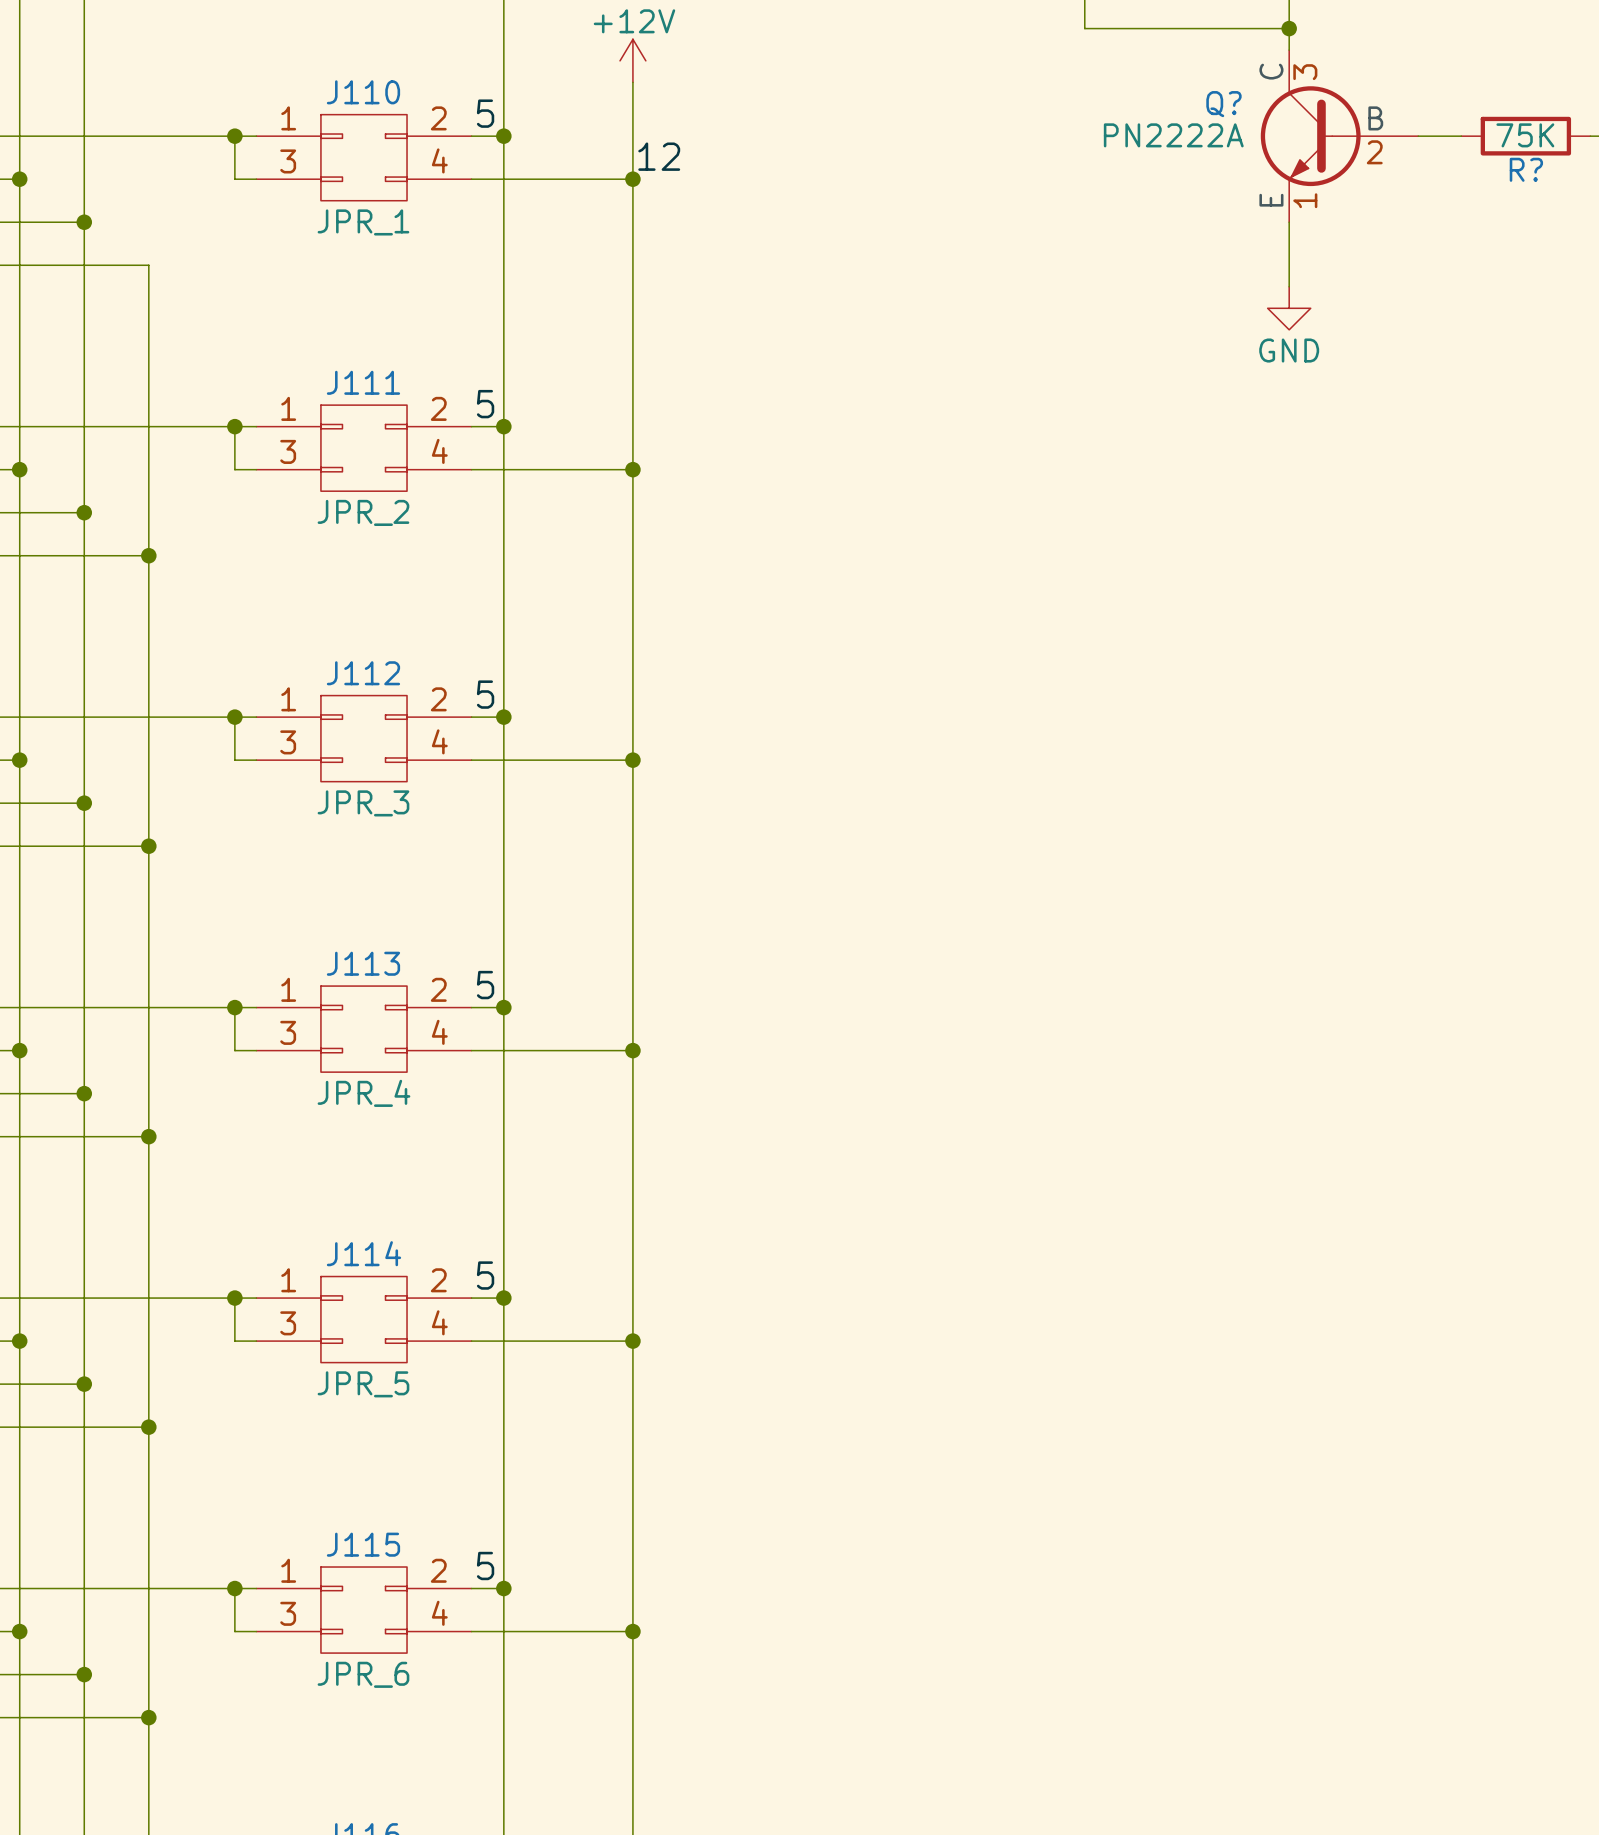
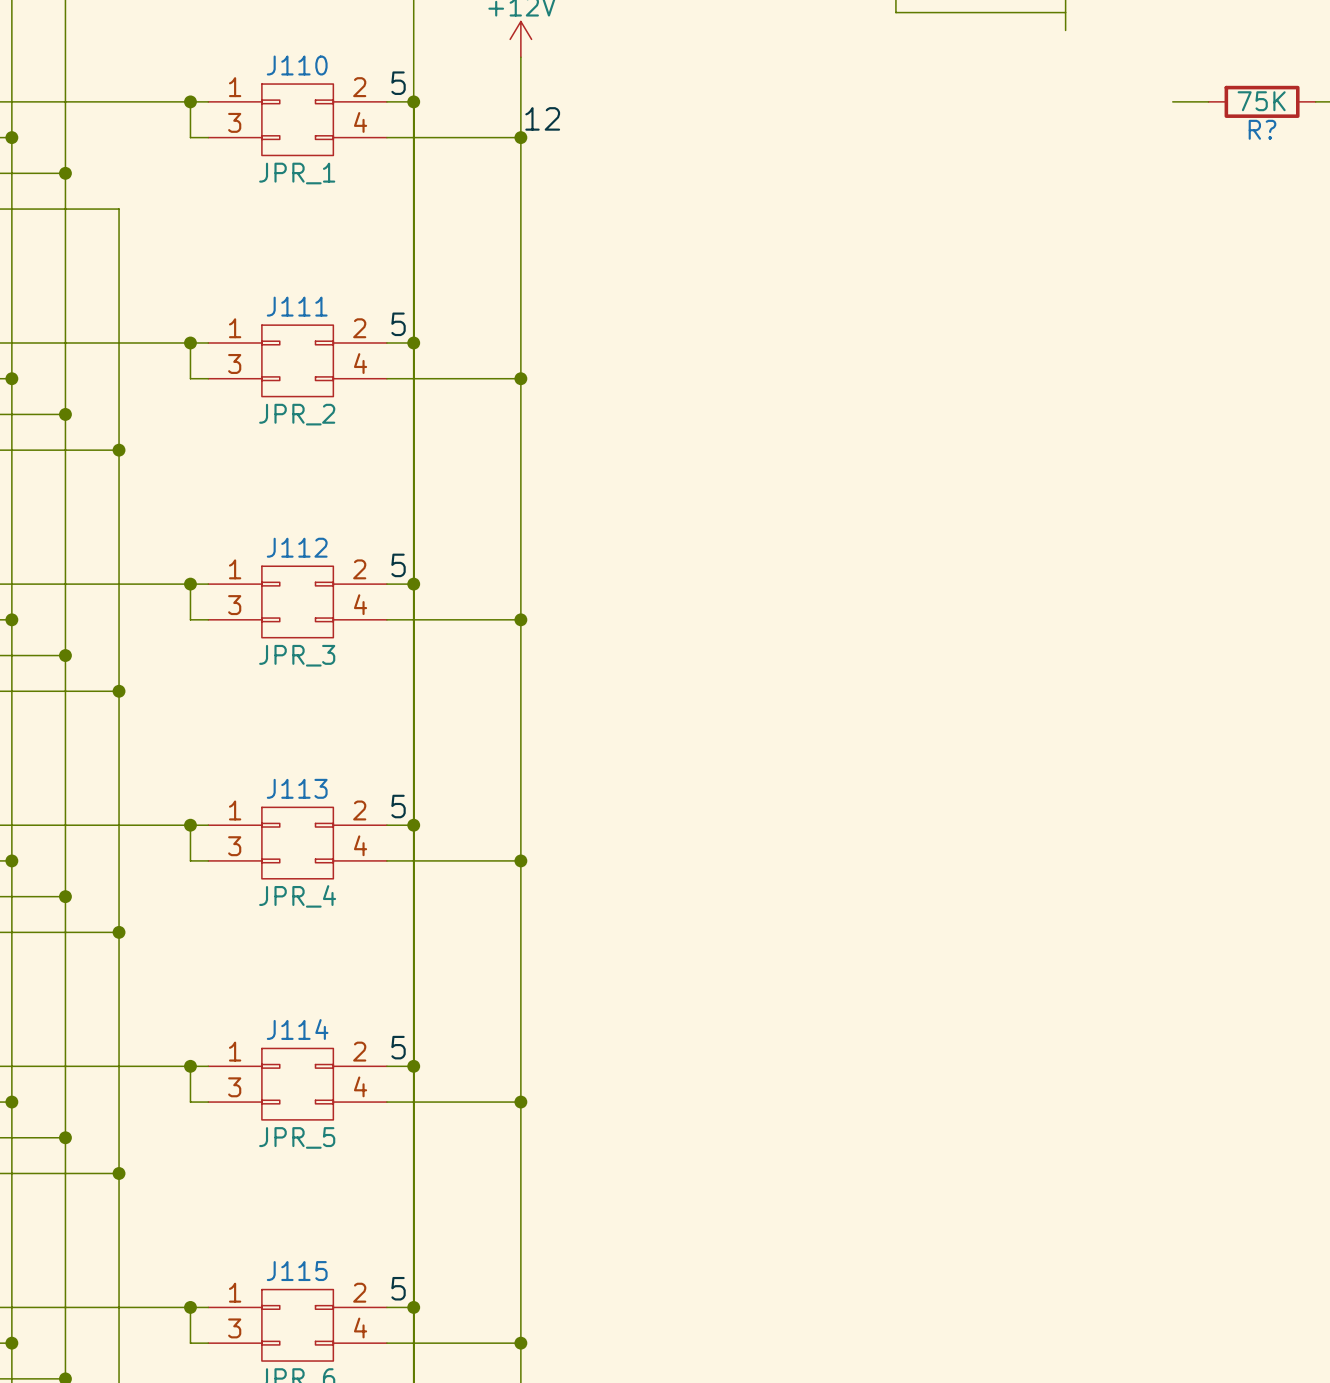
junction: (1289, 28) -> none
Q?: PN2222A (1339, 136) -> none
wire: (1289, 222) (1289, 286) -> none
power symbol: GND (1289, 308) -> none

